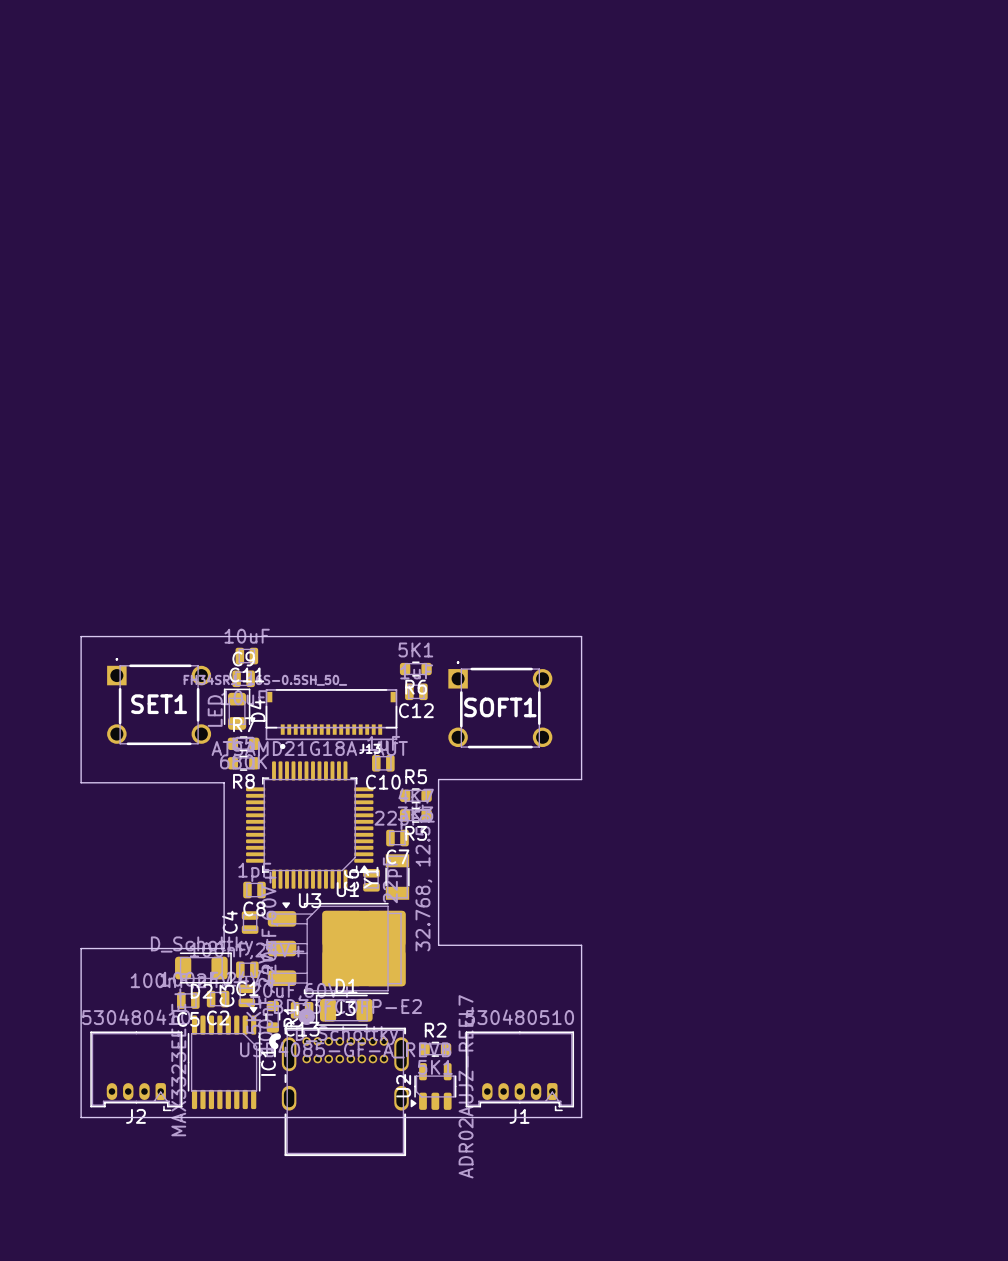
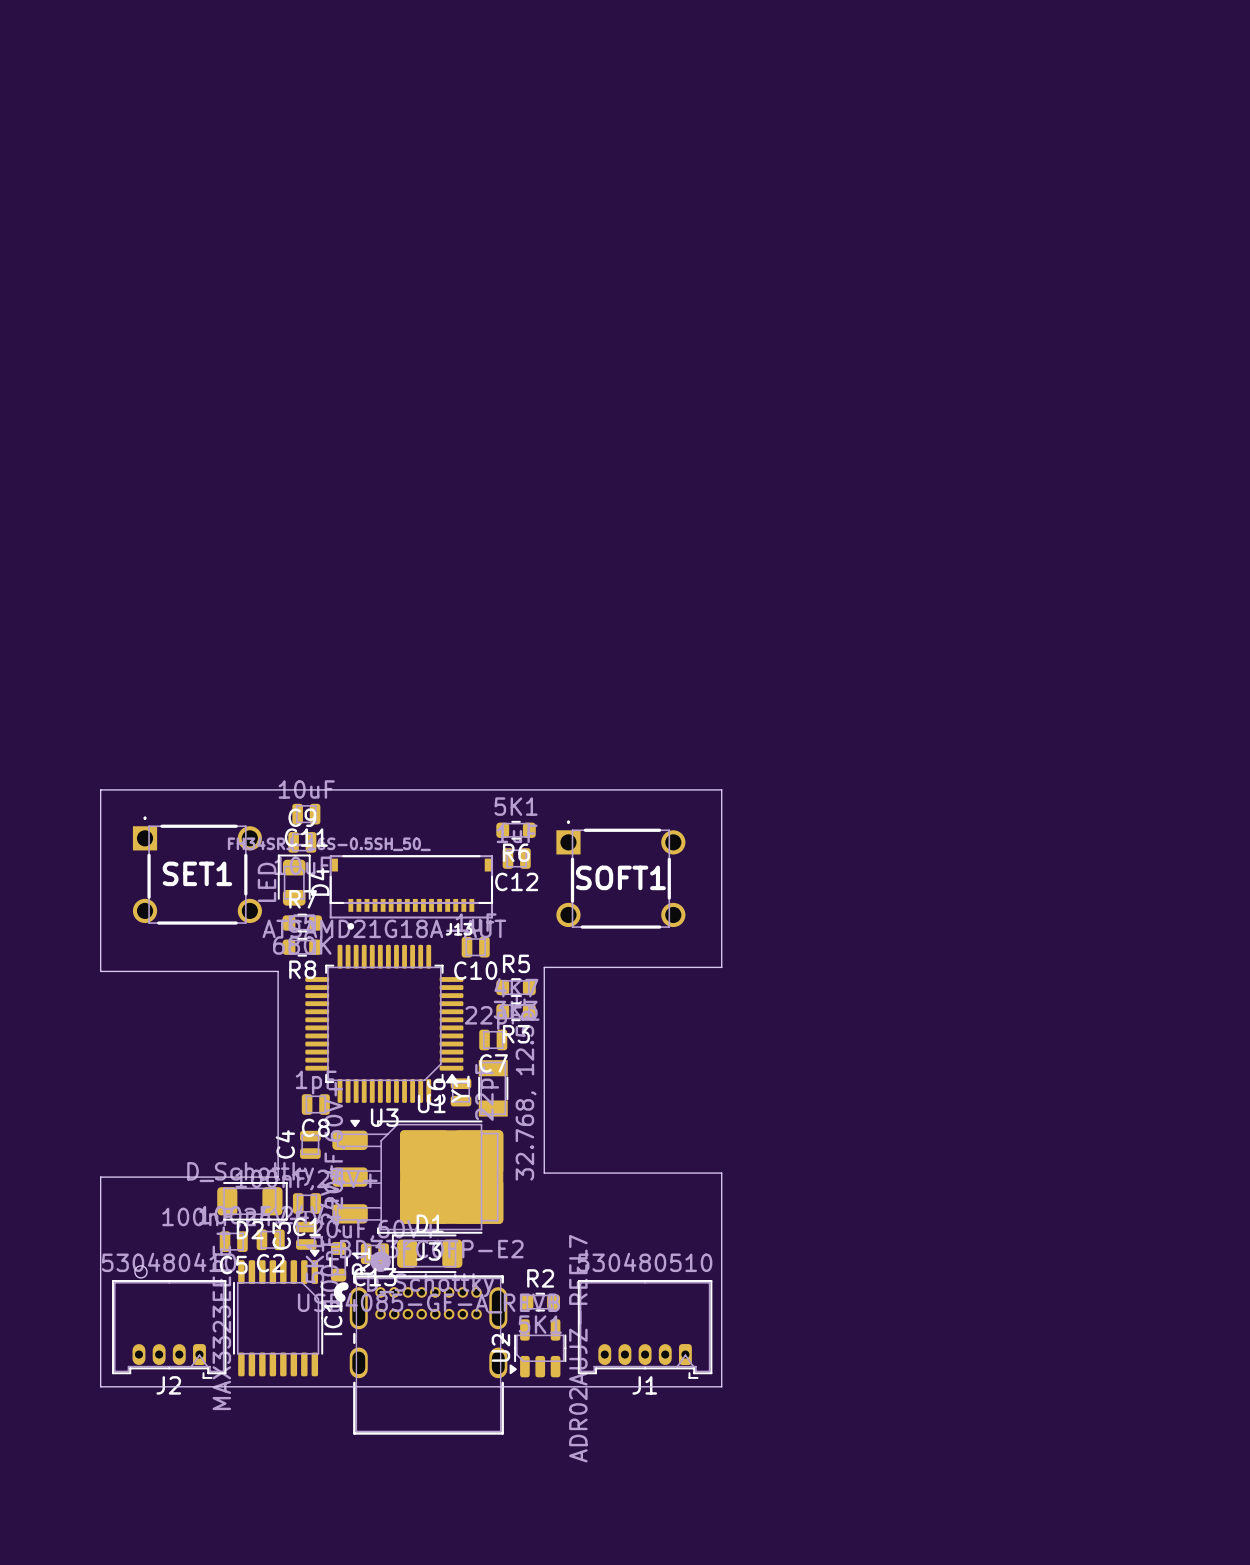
part: none -> (140, 1271)

